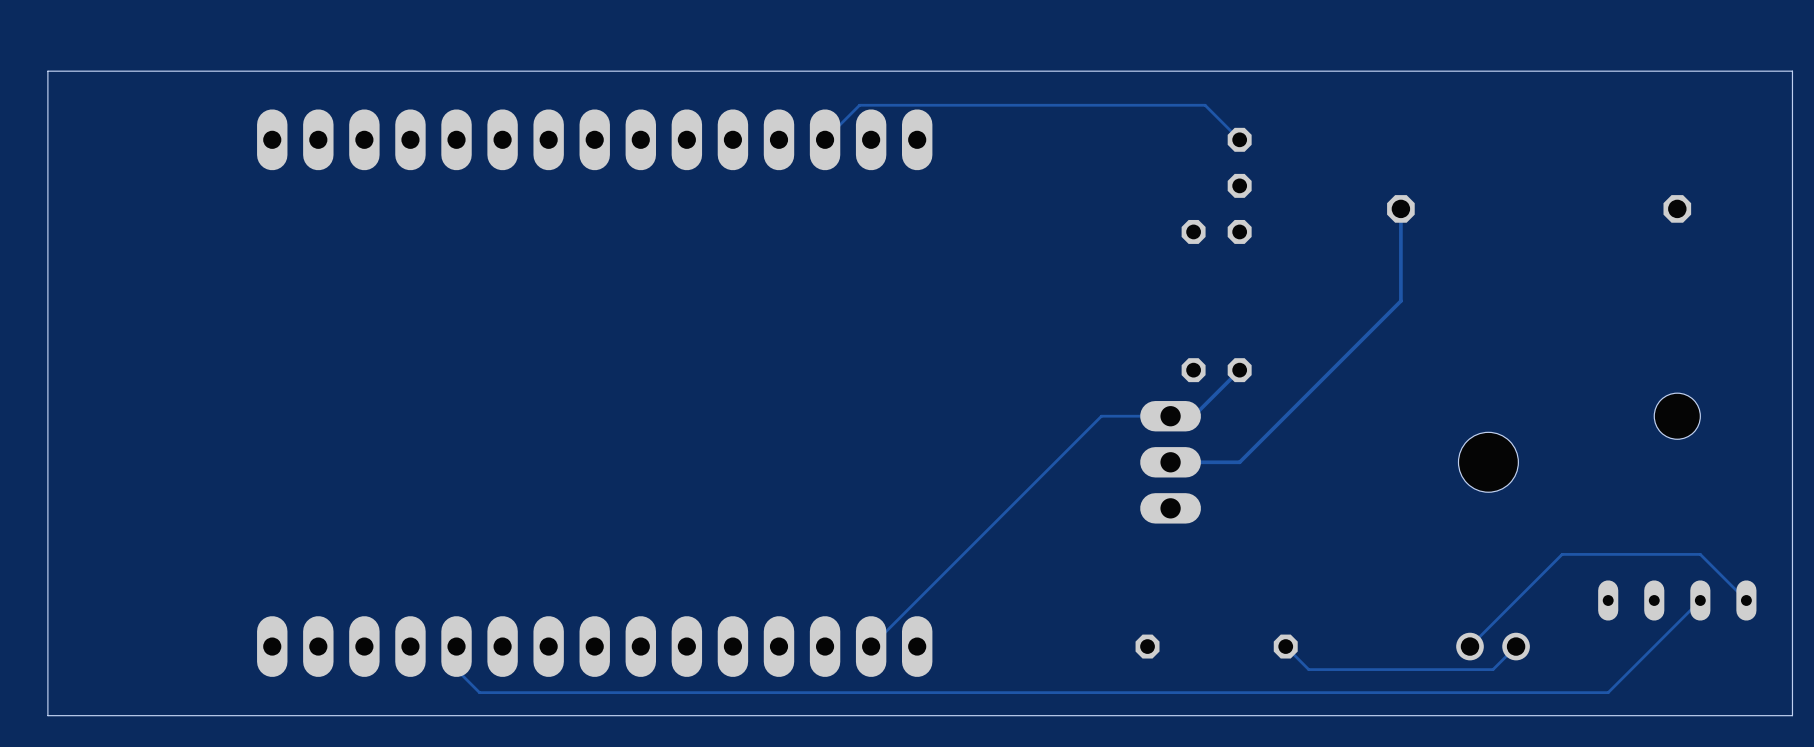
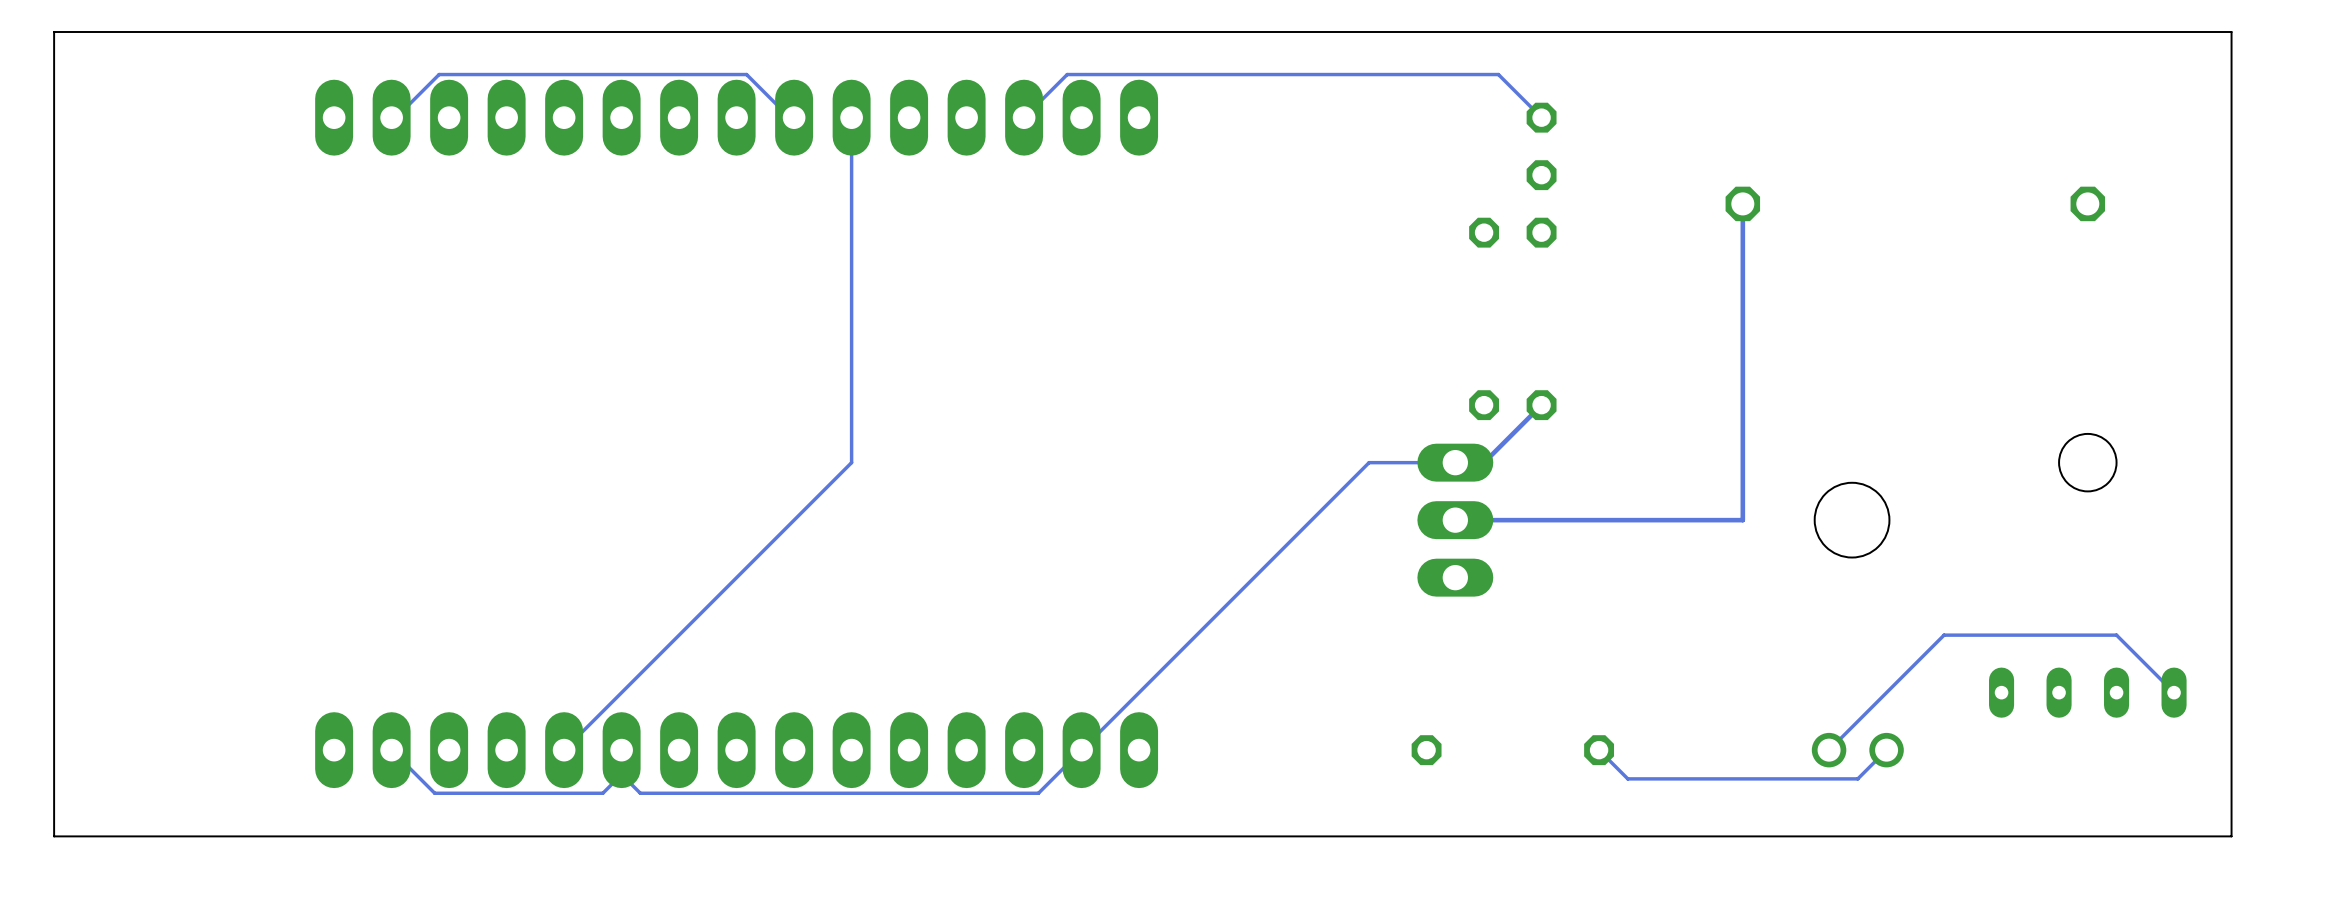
track: none -> (794, 117) (789, 117) (746, 74) (439, 74) (396, 117) (391, 117)
track: (1400, 301) (1239, 462) -> (1742, 318) (1742, 520) (1541, 520)
track: (1700, 600) (1608, 692) (479, 692) (456, 669) (456, 646) -> (851, 117) (851, 462) (564, 750)
track: none -> (1081, 750) (1038, 793) (640, 793) (625, 778) (617, 778) (602, 793) (434, 793) (391, 750)

